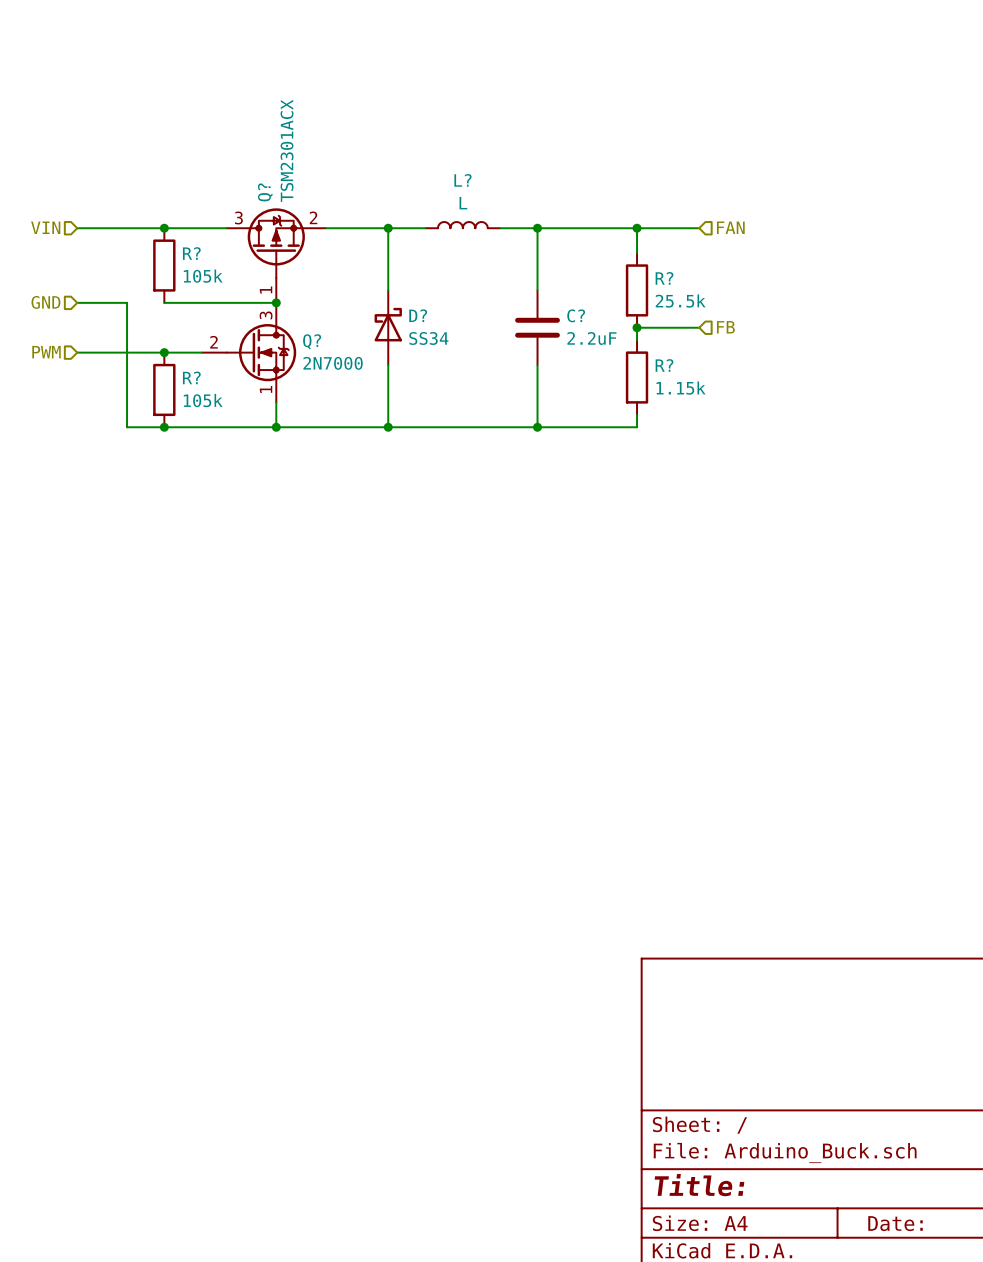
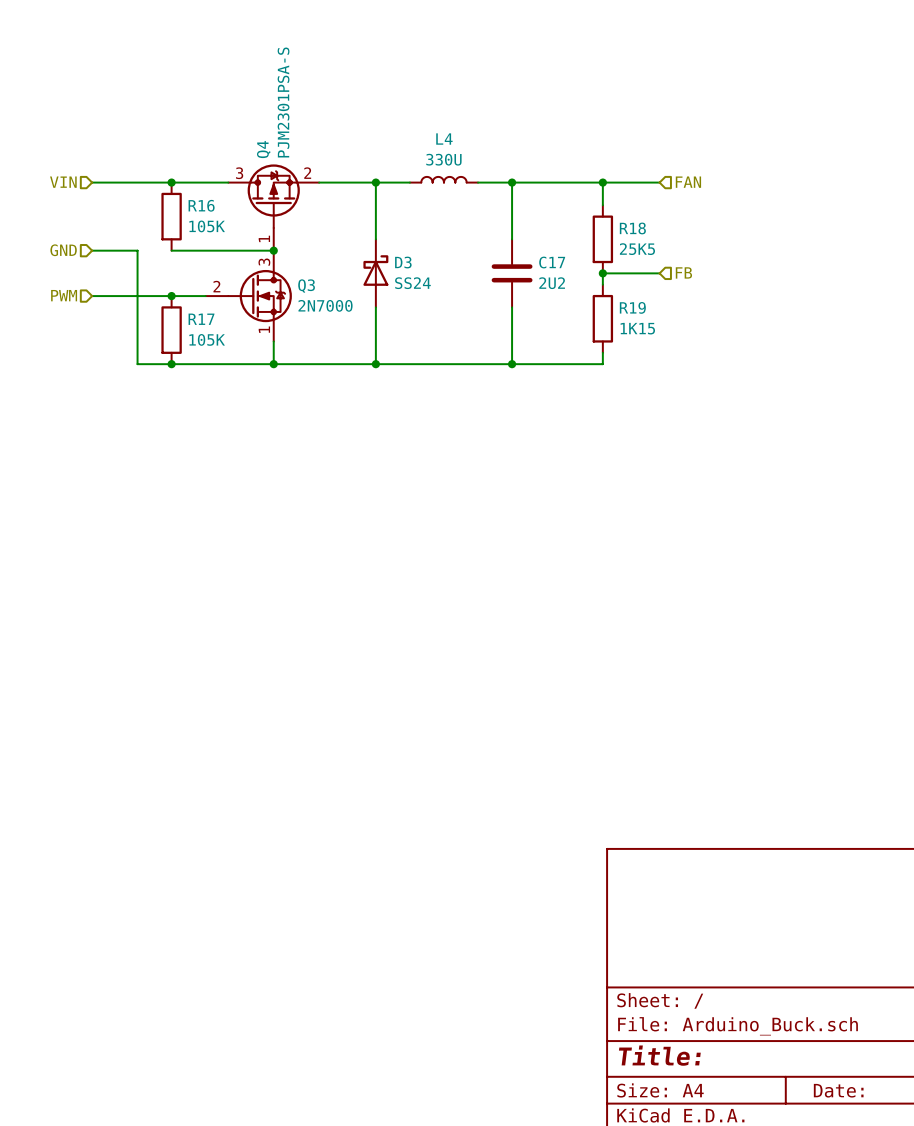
Q? value: TSM2301ACX (287, 150) -> PJM2301PSA-S (283, 102)
L? name: L? (462, 180) -> L4 (444, 139)
Q? name: Q? (265, 192) -> Q4 (263, 149)
L? value: L (463, 203) -> 330U (443, 159)
R? name: R? (191, 253) -> R16 (201, 205)
R? value: 105k (203, 276) -> 105K (207, 226)
R? name: R? (664, 278) -> R18 (632, 228)
R? value: 25.5k (680, 301) -> 25K5 (637, 249)
D? name: D? (418, 315) -> D3 (403, 262)
C? name: C? (576, 315) -> C17 (552, 262)
D? value: SS34 (428, 338) -> SS24 (412, 283)
C? value: 2.2uF (591, 338) -> 2U2 (552, 283)
Q? name: Q? (312, 341) -> Q3 (306, 286)
R? name: R? (664, 365) -> R19 (632, 307)
R? name: R? (191, 377) -> R17 (201, 319)
R? value: 1.15k (681, 388) -> 1K15 (637, 328)
R? value: 105k (203, 400) -> 105K (207, 339)

